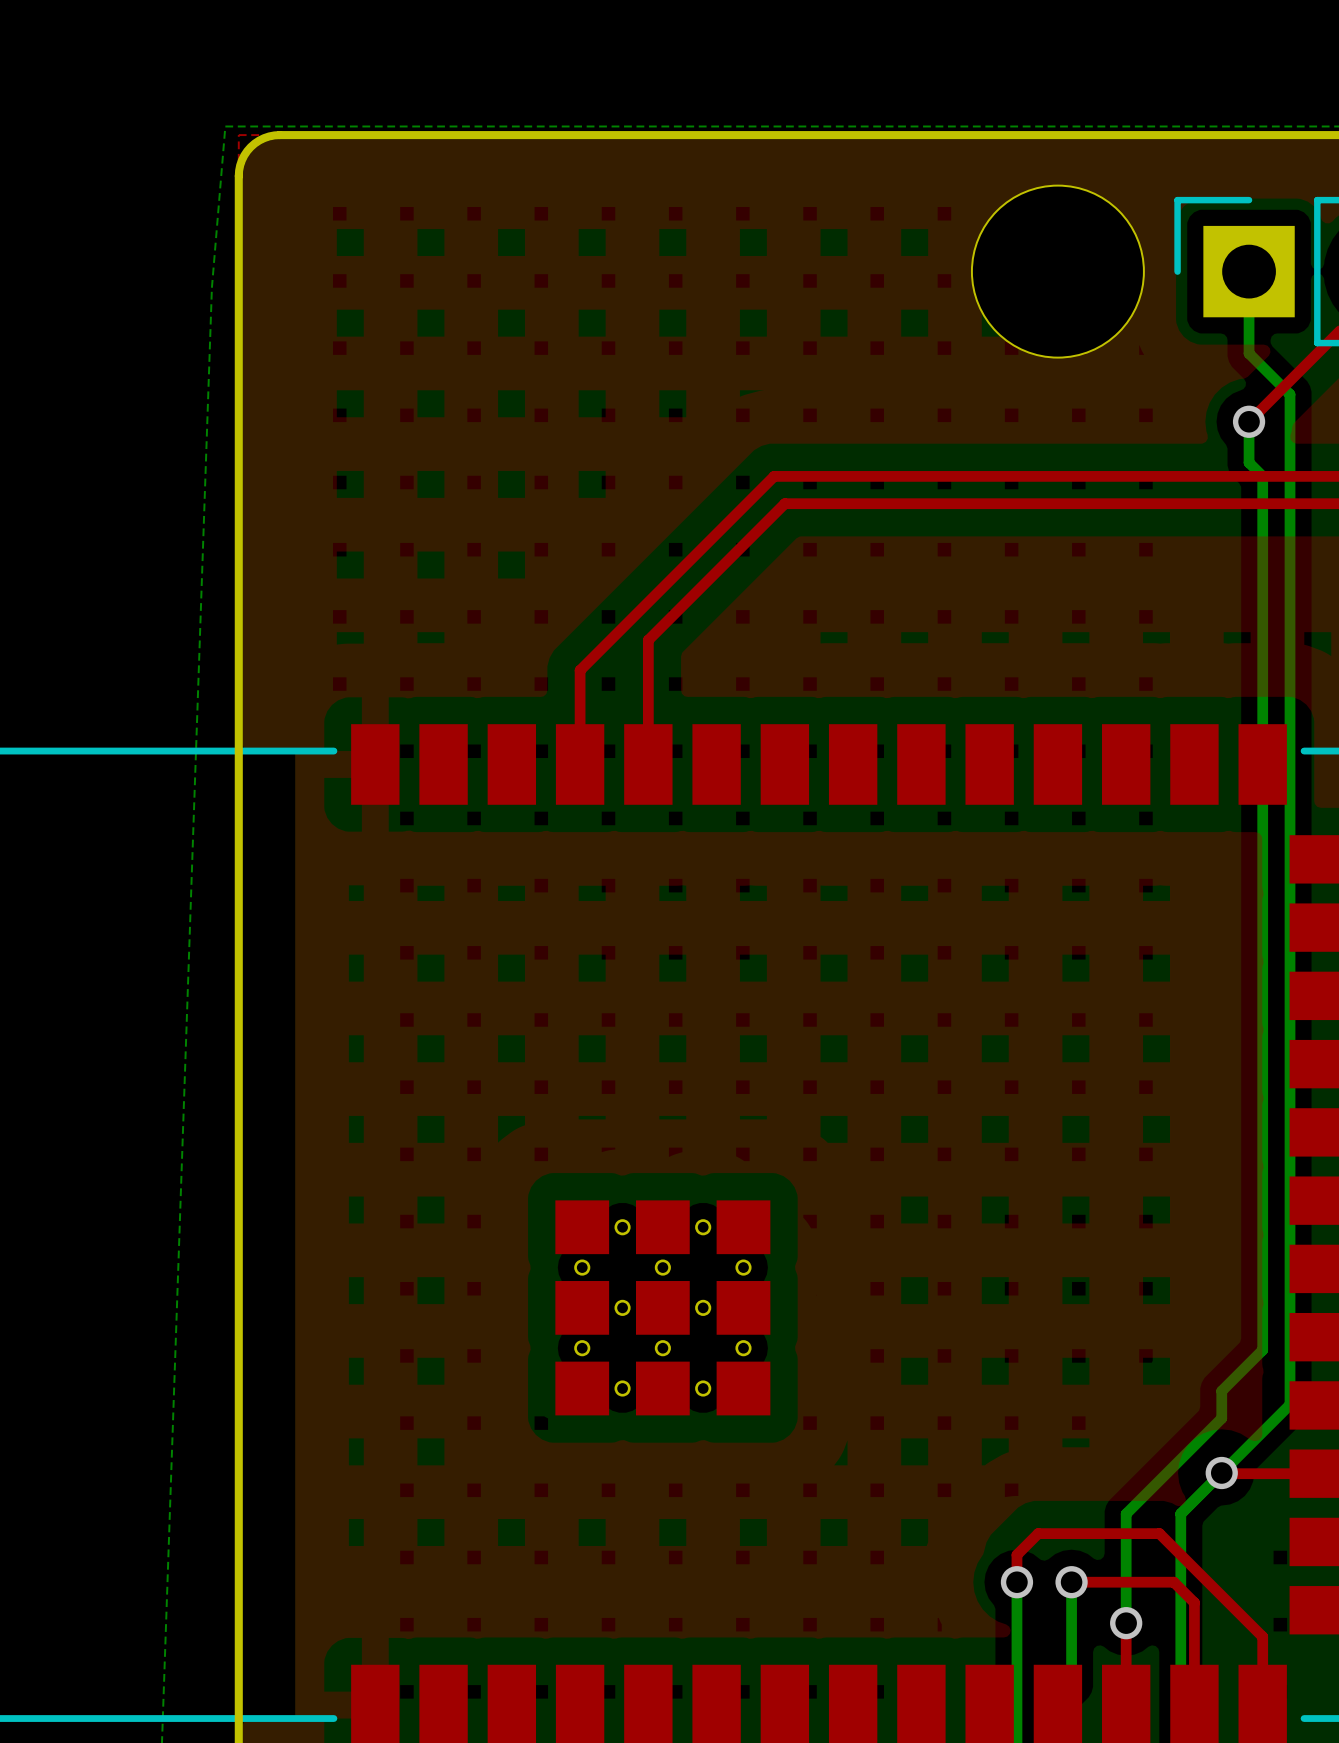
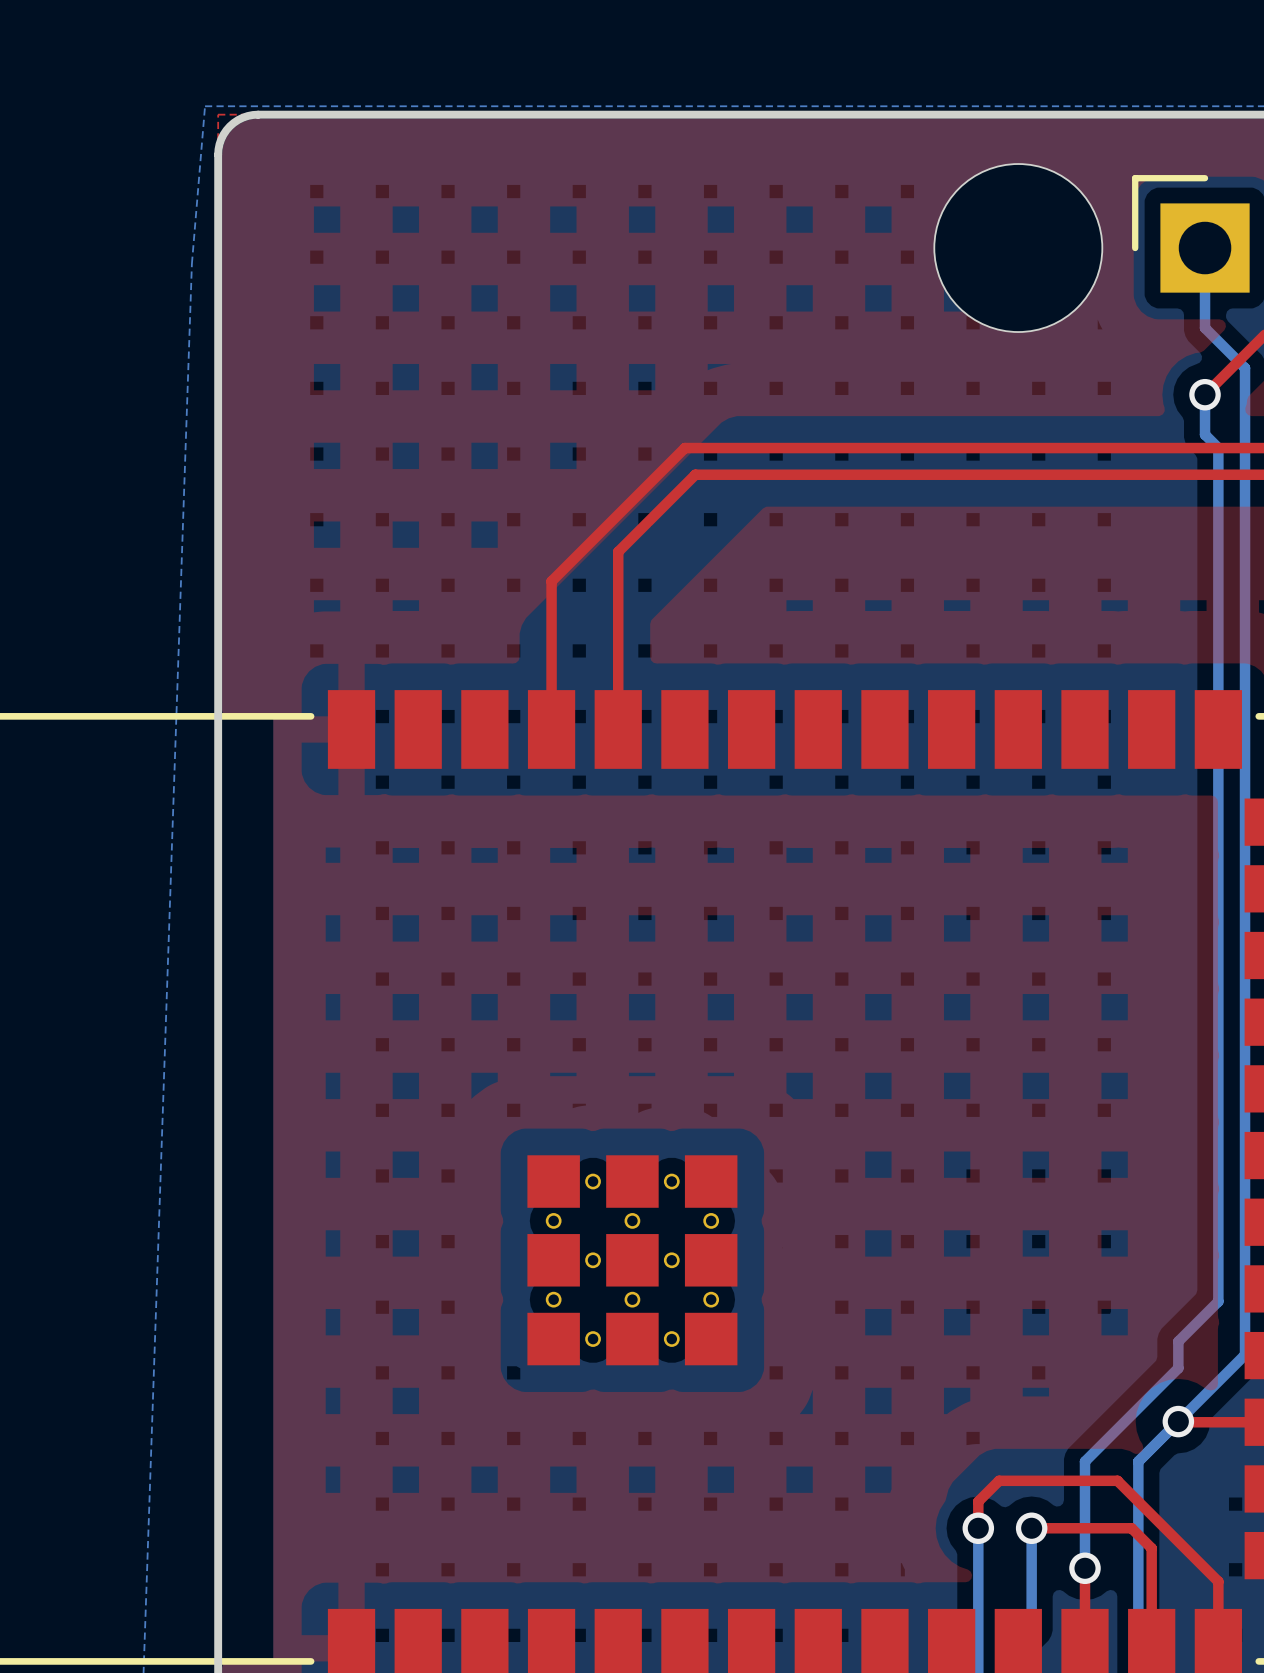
top track: (774, 476) (580, 670) -> (741, 448) (684, 448) (551, 581) (551, 637)
top track: (784, 503) (648, 640) -> (751, 474) (695, 474) (618, 551) (618, 608)

